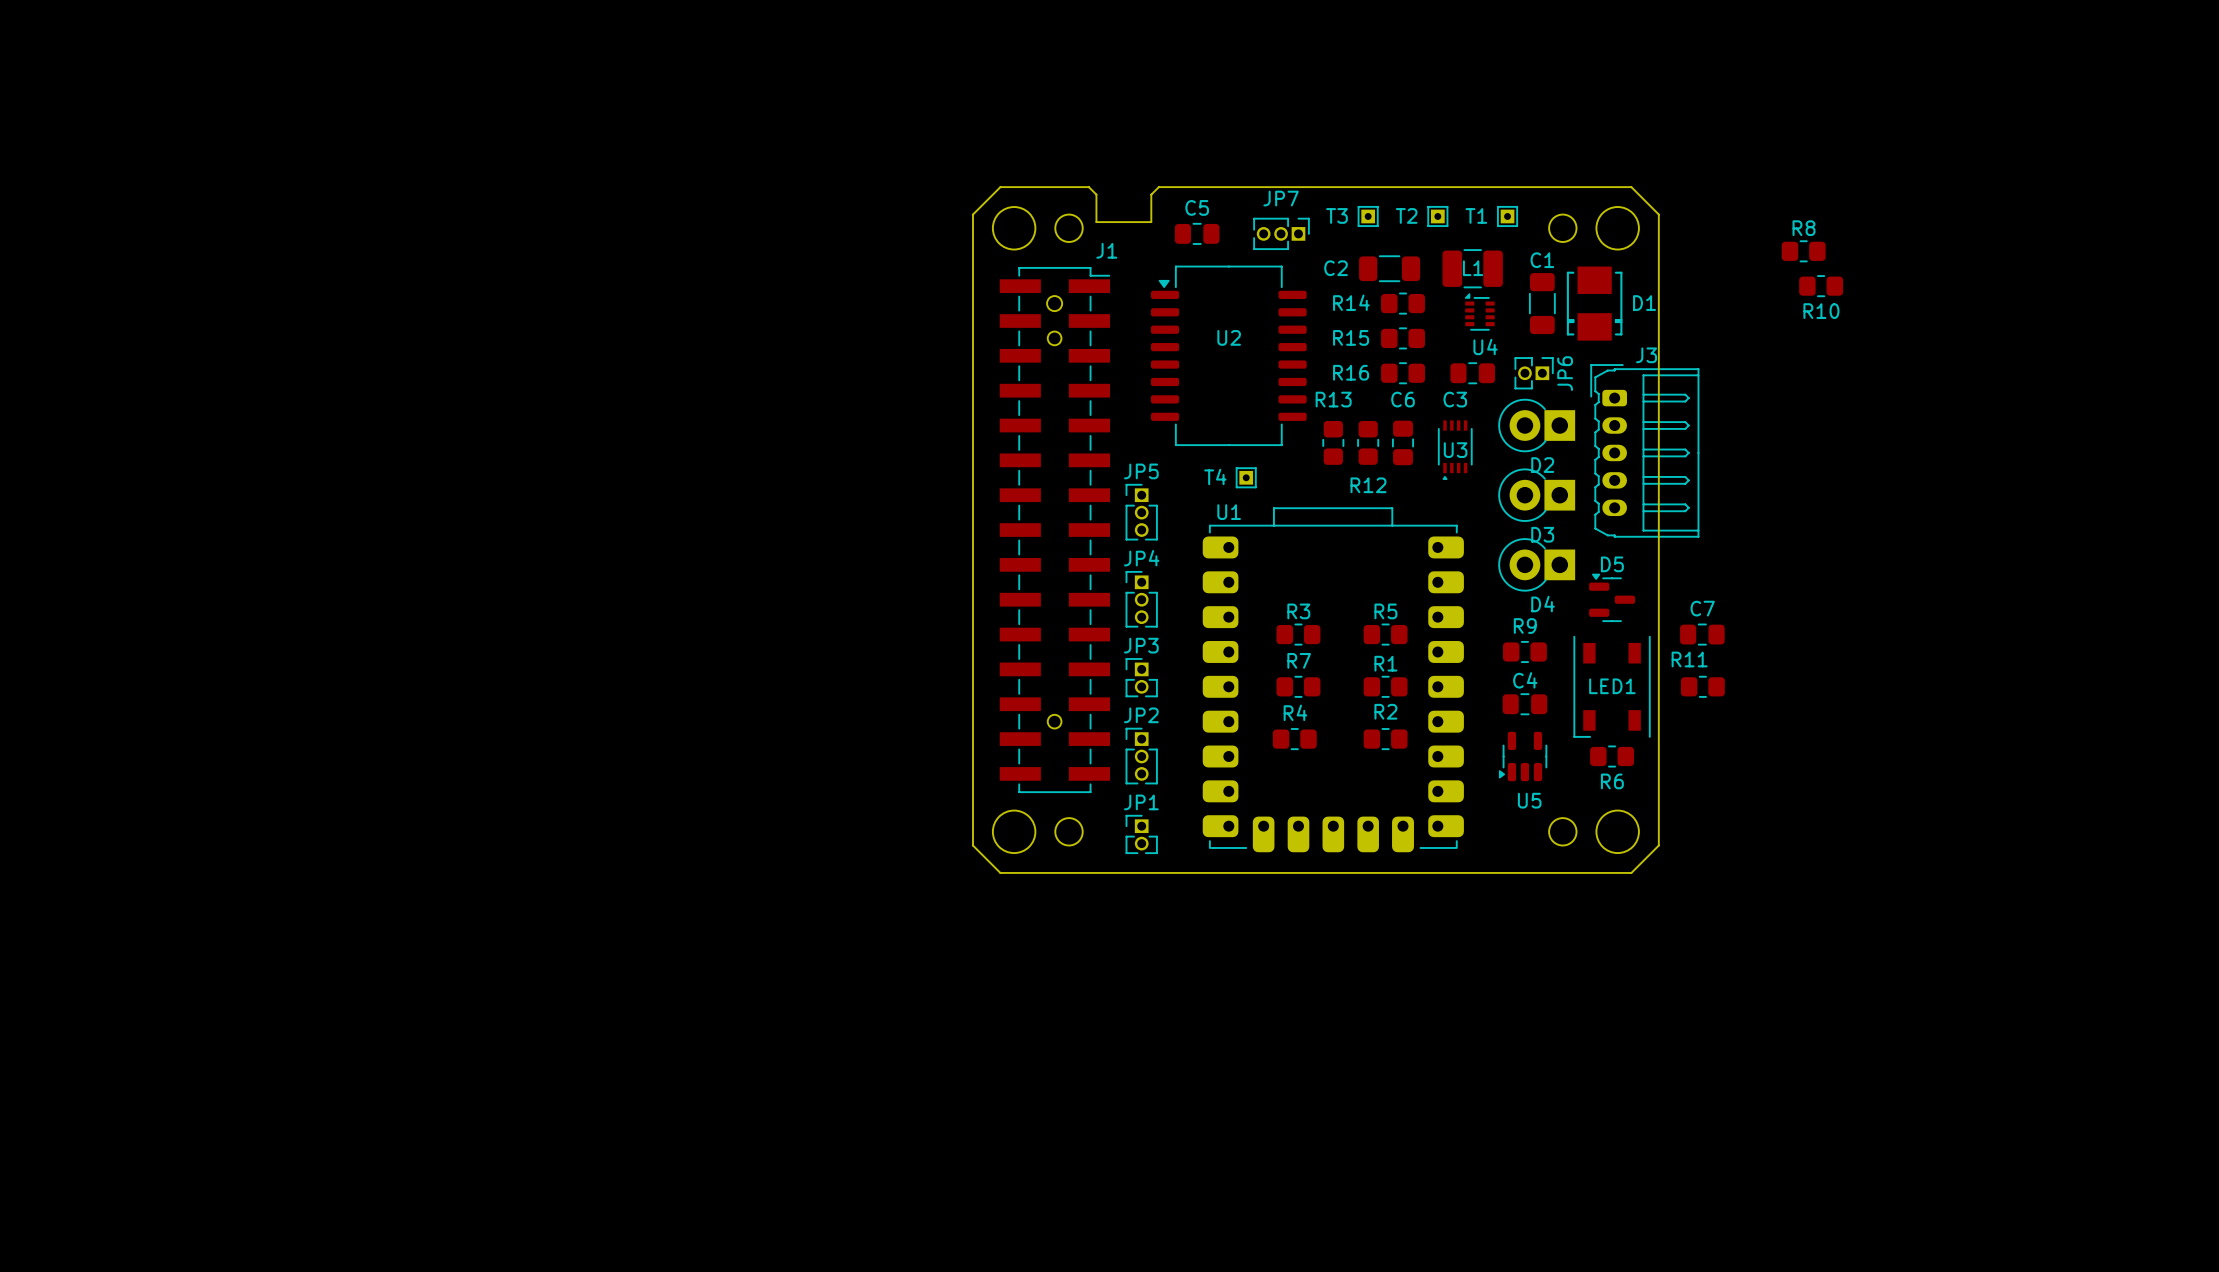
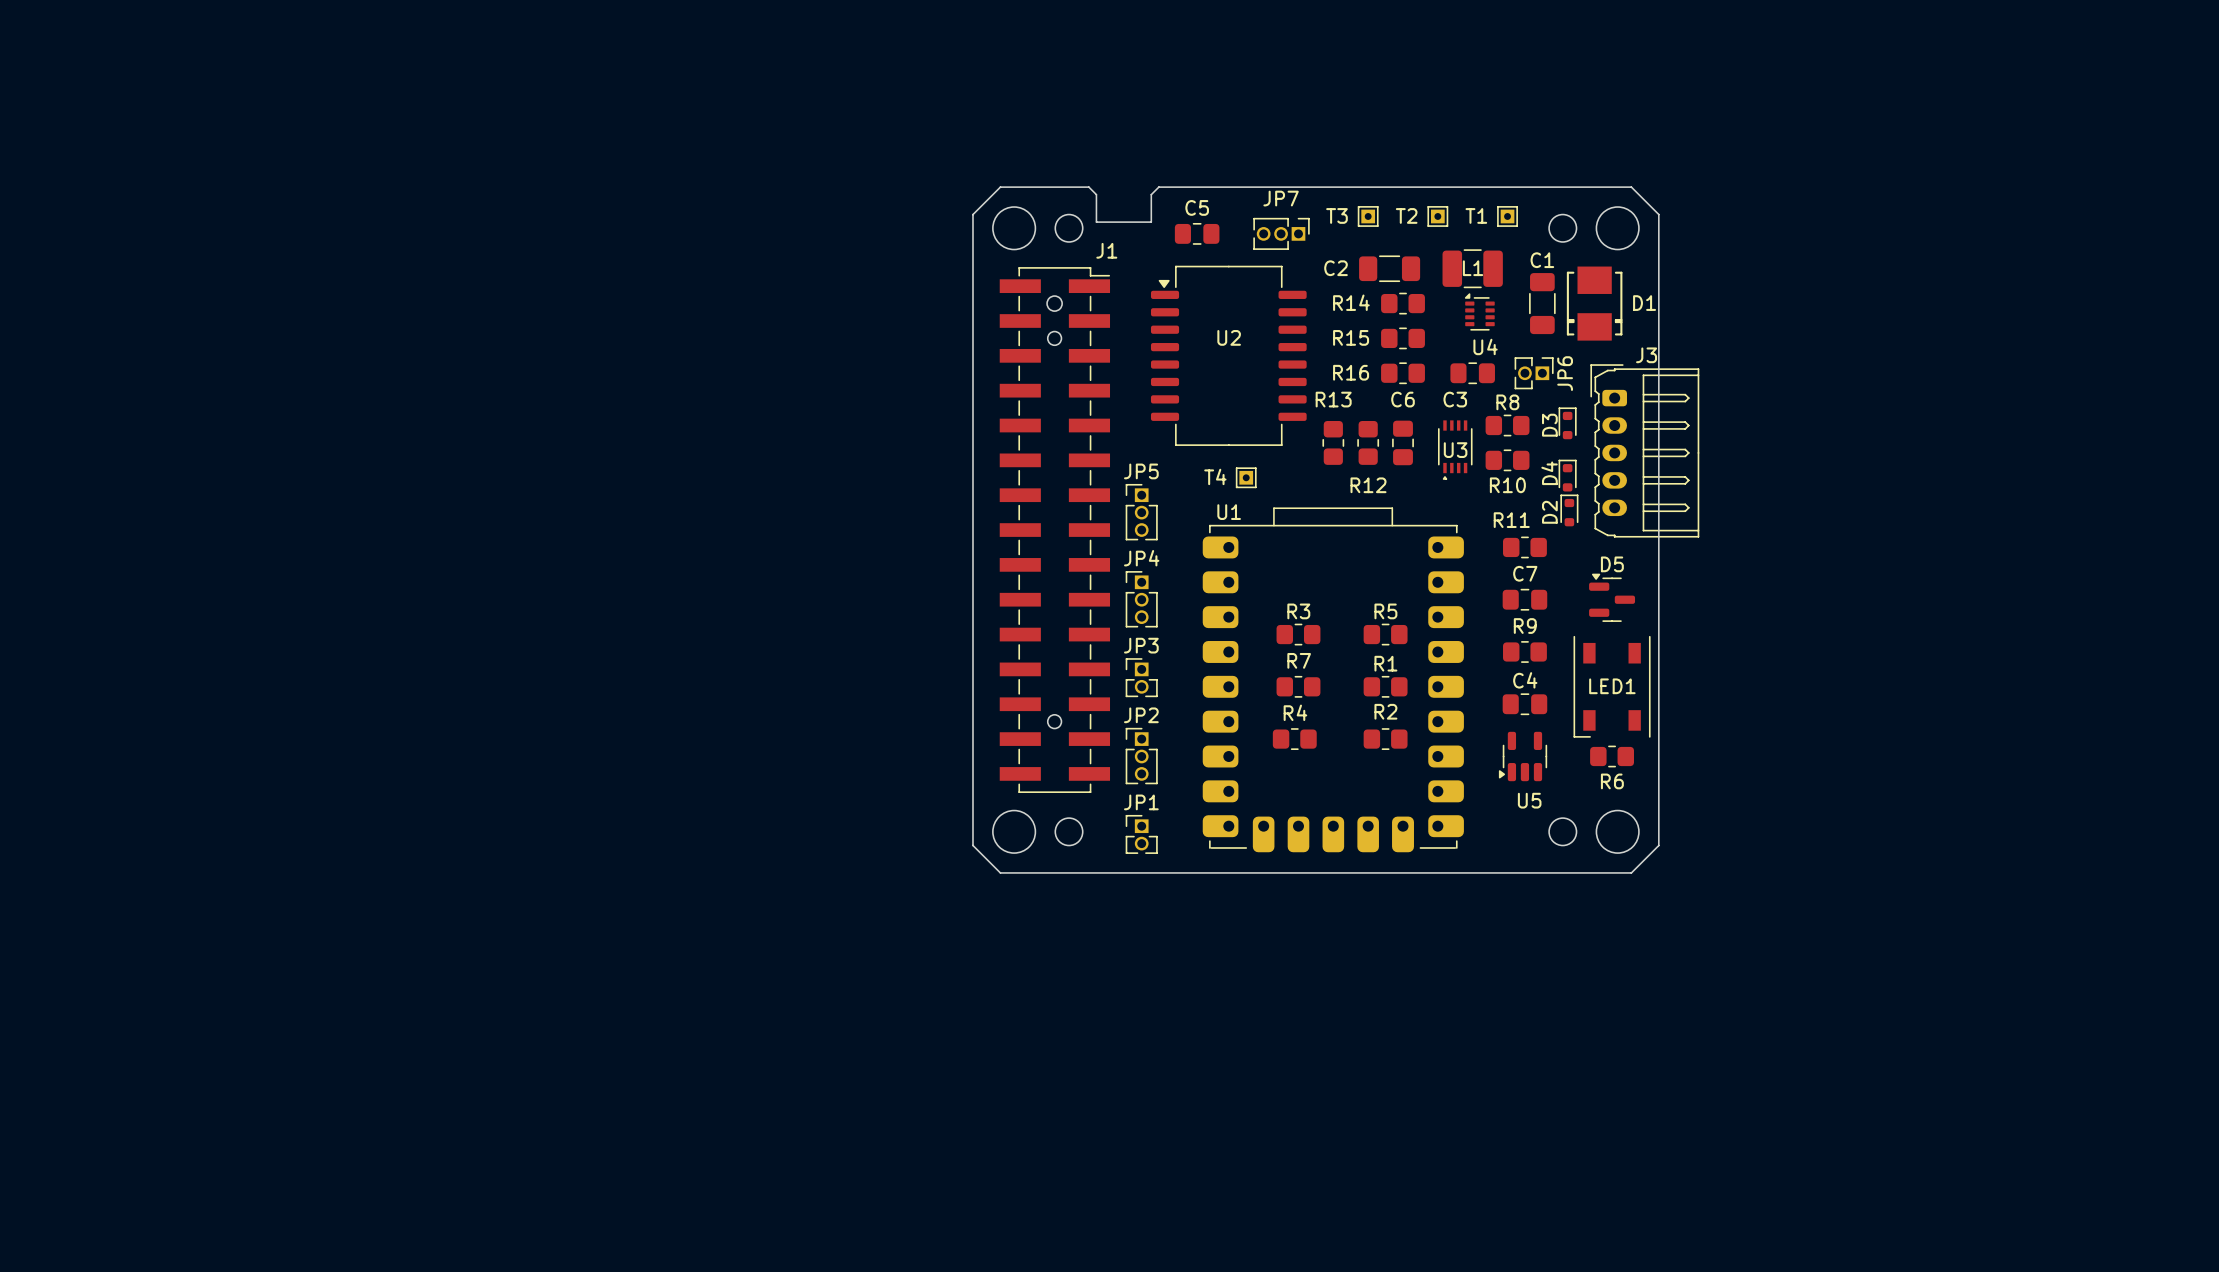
R8 position: (1803, 251) -> (1507, 425)
R10 position: (1821, 286) -> (1507, 460)
D2 footprint: [1498, 398, 1576, 453] -> [1560, 494, 1579, 527]
D2 name position: D2 (1542, 465) -> D2 (1549, 512)
D3 footprint: [1498, 468, 1576, 522] -> [1558, 407, 1577, 440]
D3 name position: D3 (1542, 534) -> D3 (1549, 425)
D4 footprint: [1498, 538, 1576, 592] -> [1558, 459, 1577, 492]
D4 name position: D4 (1543, 604) -> D4 (1549, 473)
C7 position: (1702, 634) -> (1524, 599)
R11 position: (1702, 686) -> (1524, 547)

